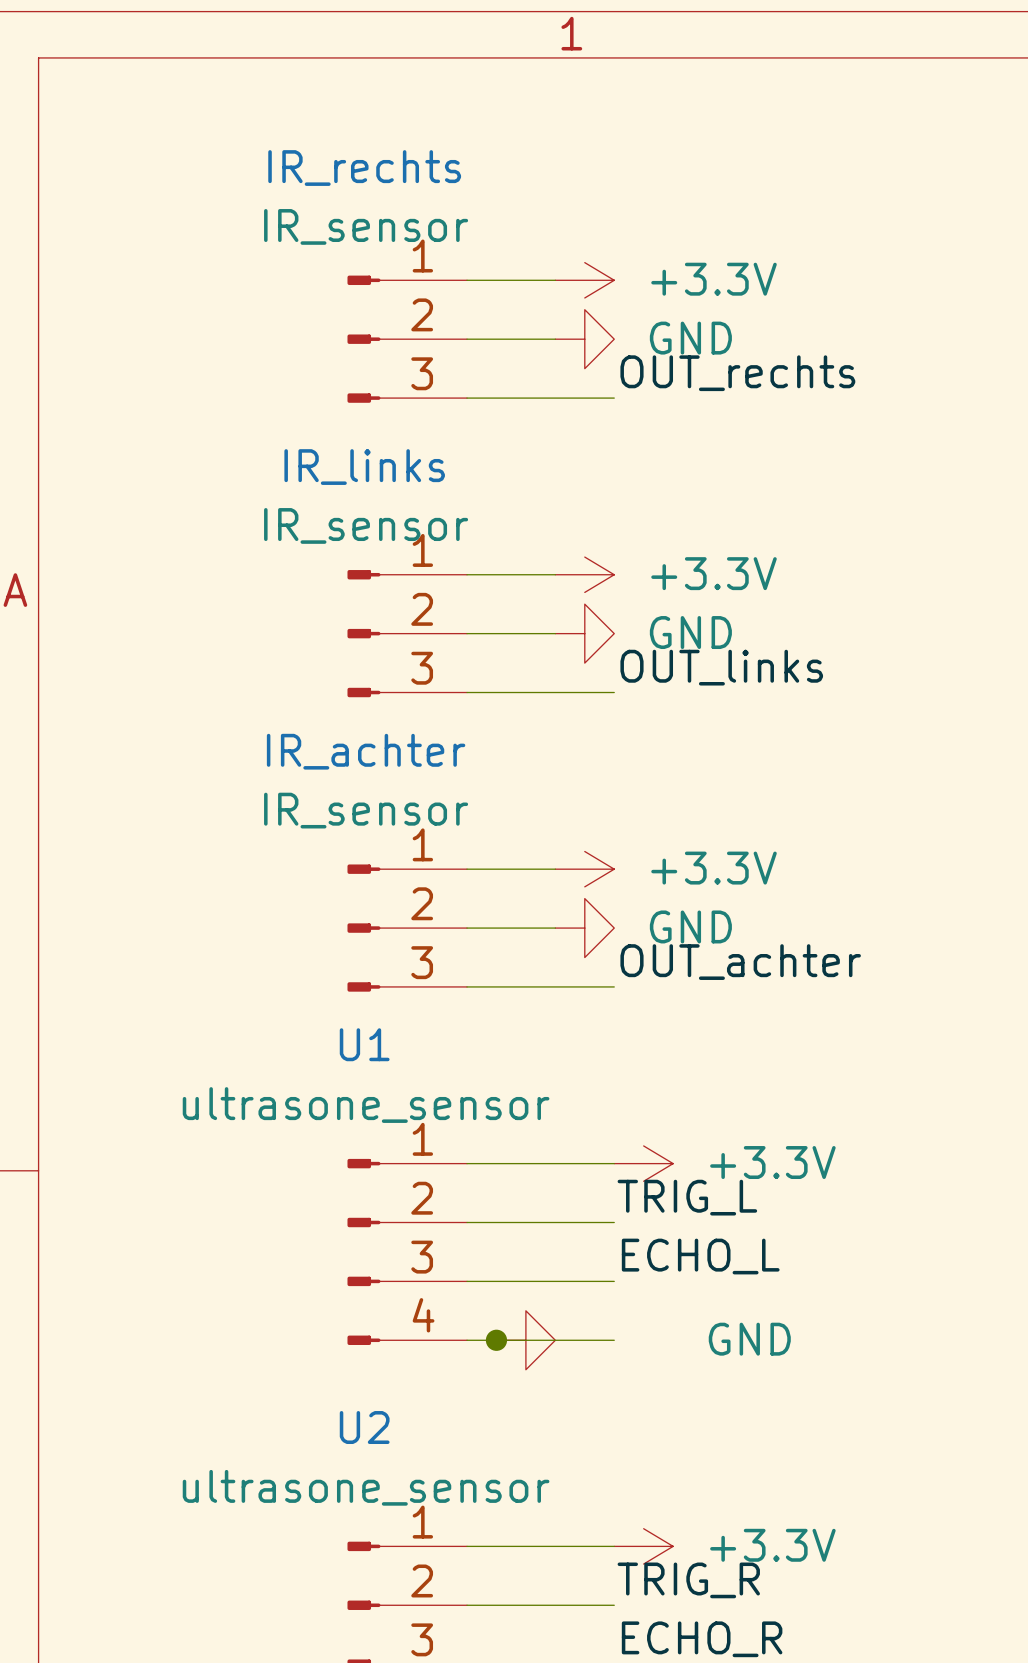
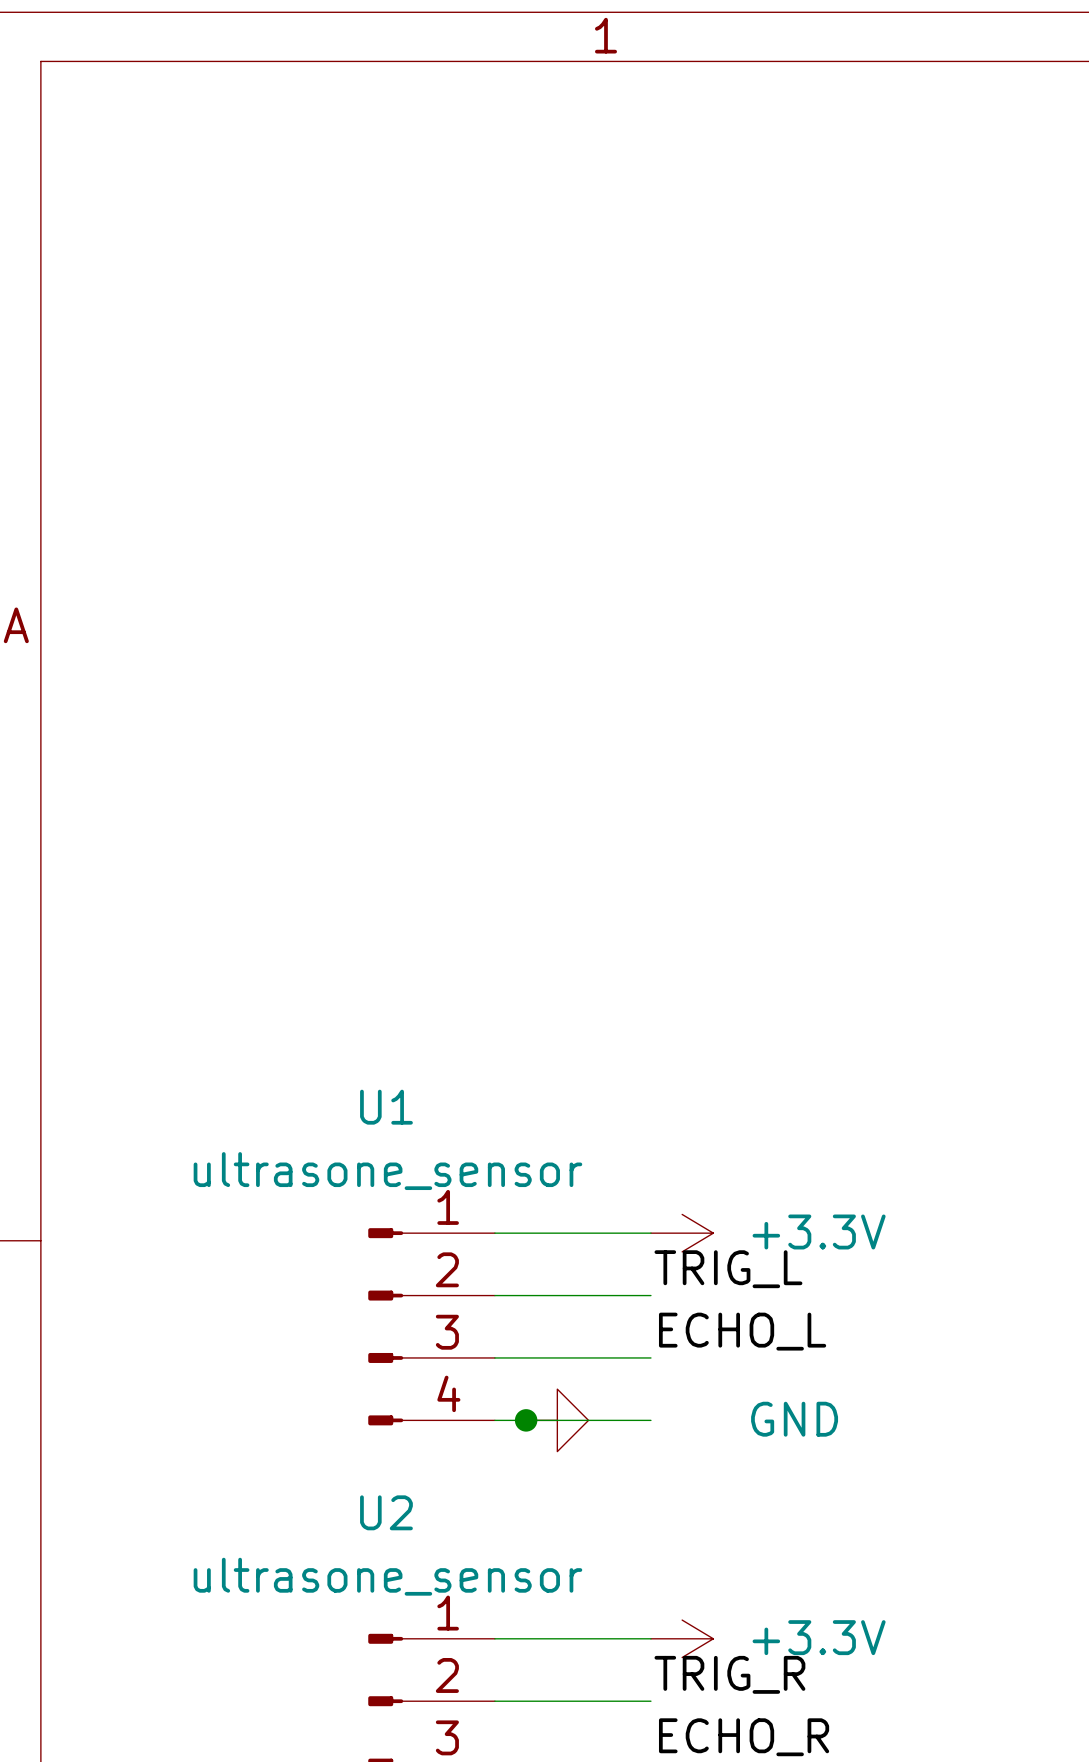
wire: (467, 280) (555, 280) -> none
power symbol: +3.3V (584, 280) -> none
IR_rechts: IR_sensor (407, 339) -> none
wire: (467, 339) (555, 339) -> none
power symbol: GND (584, 339) -> none
label: OUT_rechts (737, 373) -> none
wire: (467, 398) (614, 398) -> none
wire: (467, 574) (555, 574) -> none
power symbol: +3.3V (584, 574) -> none
IR_links: IR_sensor (407, 633) -> none
wire: (467, 633) (555, 633) -> none
power symbol: GND (584, 633) -> none
label: OUT_links (721, 667) -> none
wire: (467, 692) (614, 692) -> none
wire: (467, 869) (555, 869) -> none
power symbol: +3.3V (584, 869) -> none
IR_achter: IR_sensor (407, 928) -> none
wire: (467, 928) (555, 928) -> none
power symbol: GND (584, 928) -> none
label: OUT_achter (740, 962) -> none
wire: (467, 986) (614, 986) -> none

